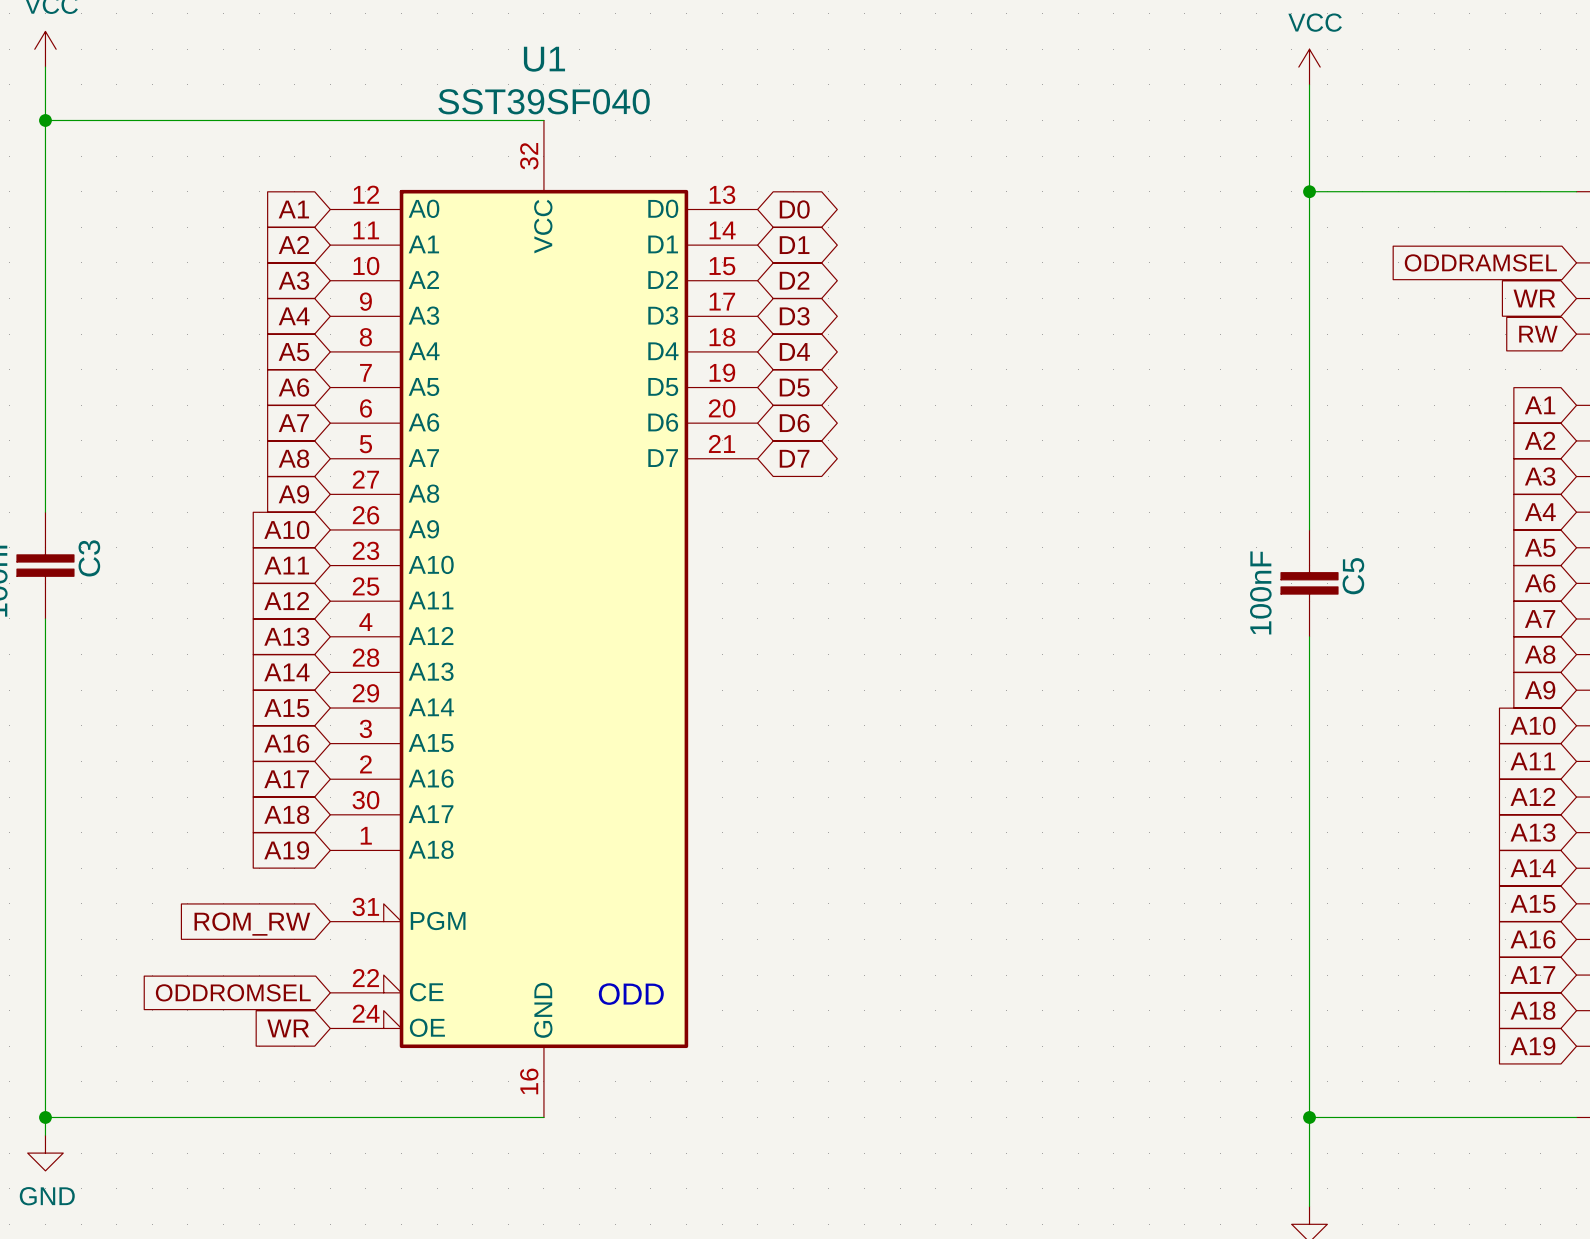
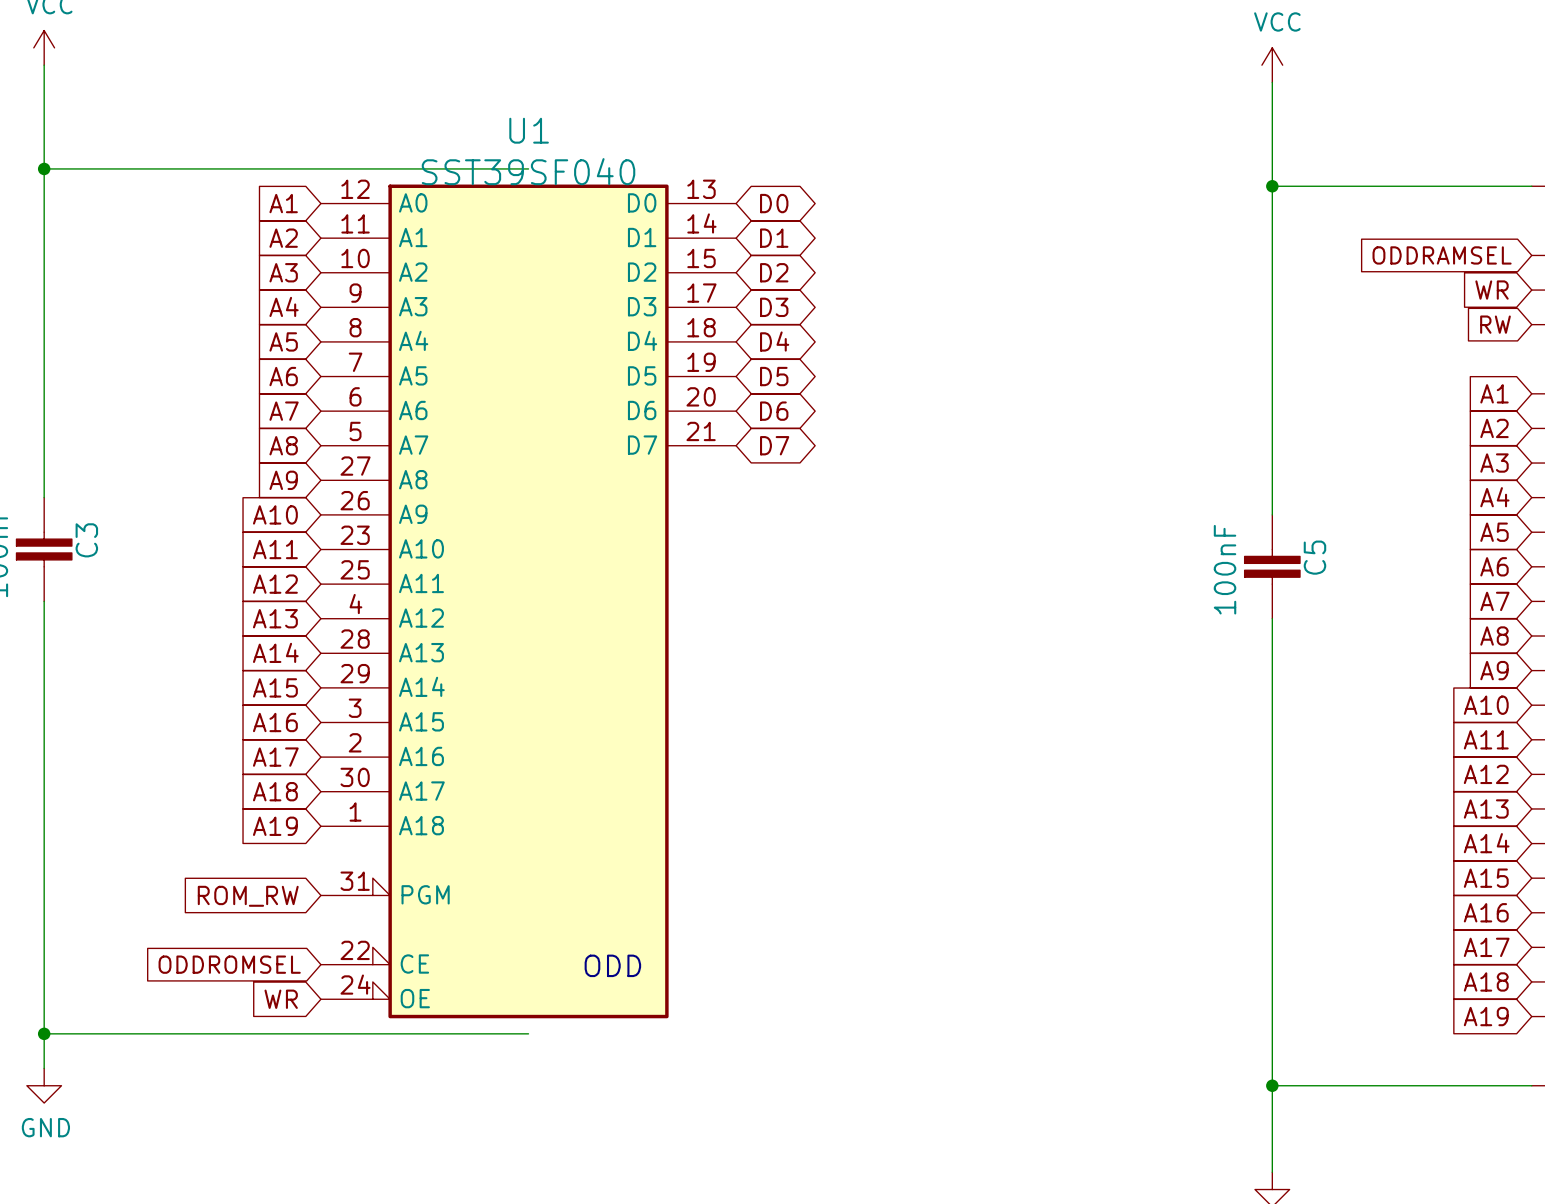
U1 name position: U1 (544, 59) -> U1 (529, 130)
U1 value position: SST39SF040 (544, 101) -> SST39SF040 (528, 171)
wire: (45, 120) (543, 120) -> (44, 168) (528, 168)
junction position: (45, 120) -> (44, 168)
U1 symbol: [330, 120, 758, 1118] -> [320, 184, 737, 1019]
wire: (45, 1117) (543, 1117) -> (44, 1033) (528, 1033)
junction position: (45, 1117) -> (44, 1033)
power symbol position: GND (45, 1153) -> GND (44, 1085)

